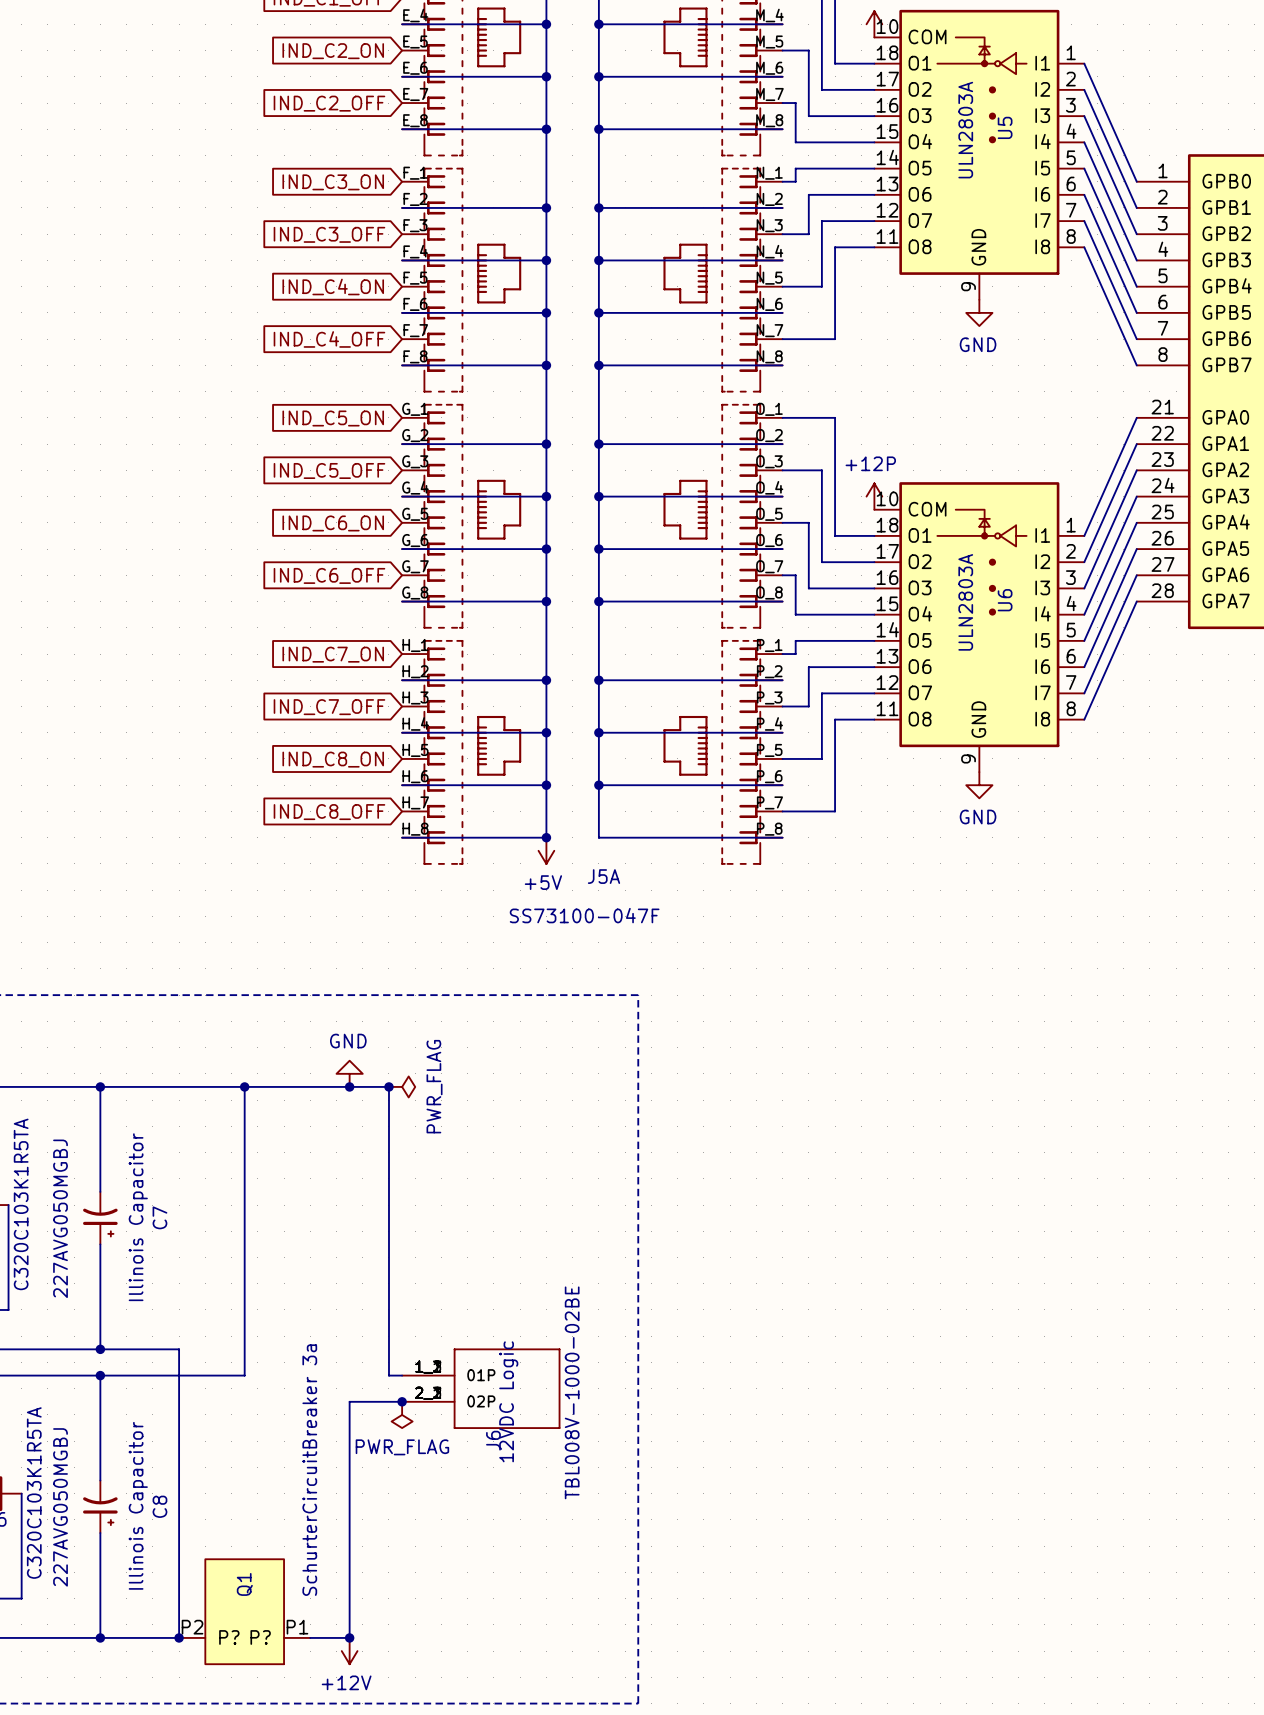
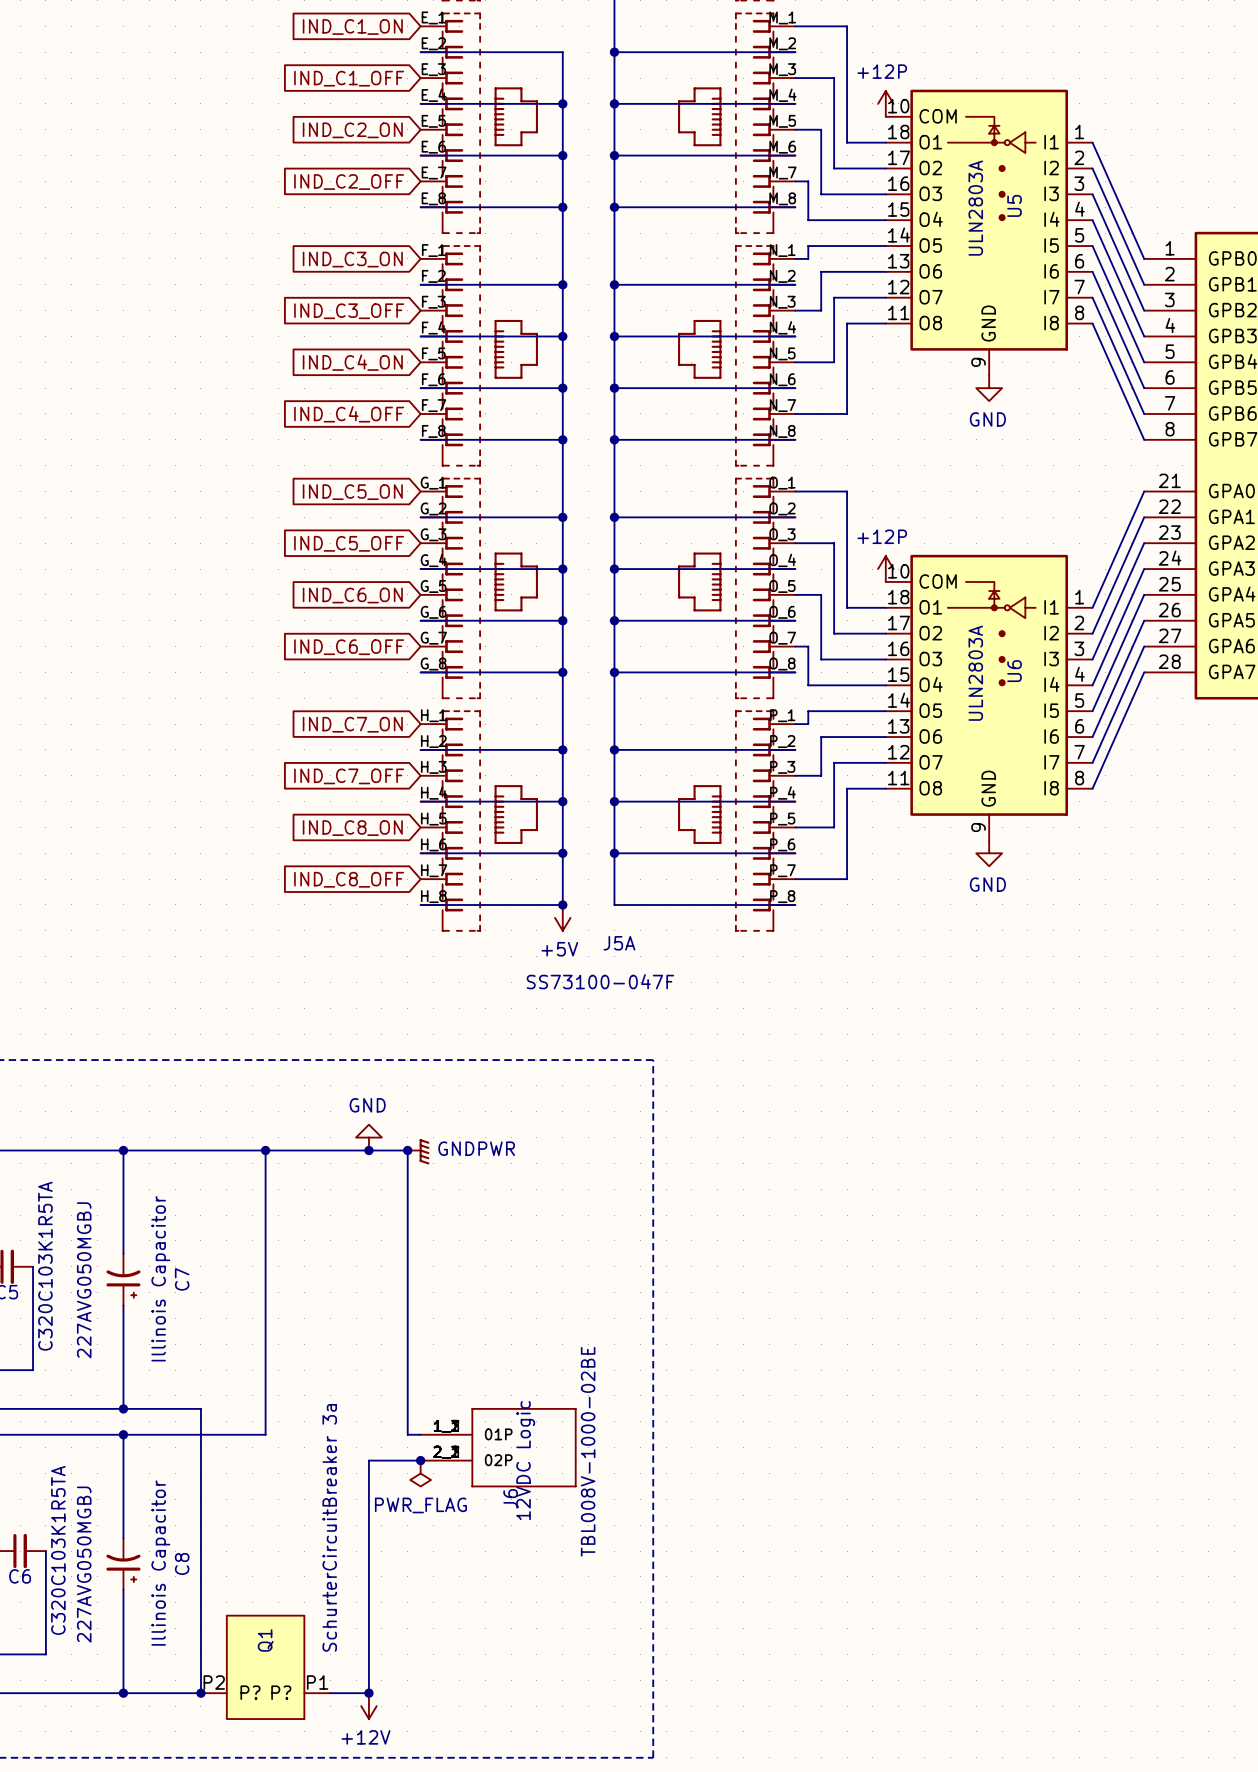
power symbol: PWR_FLAG (402, 1086) -> GNDPWR (418, 1151)

